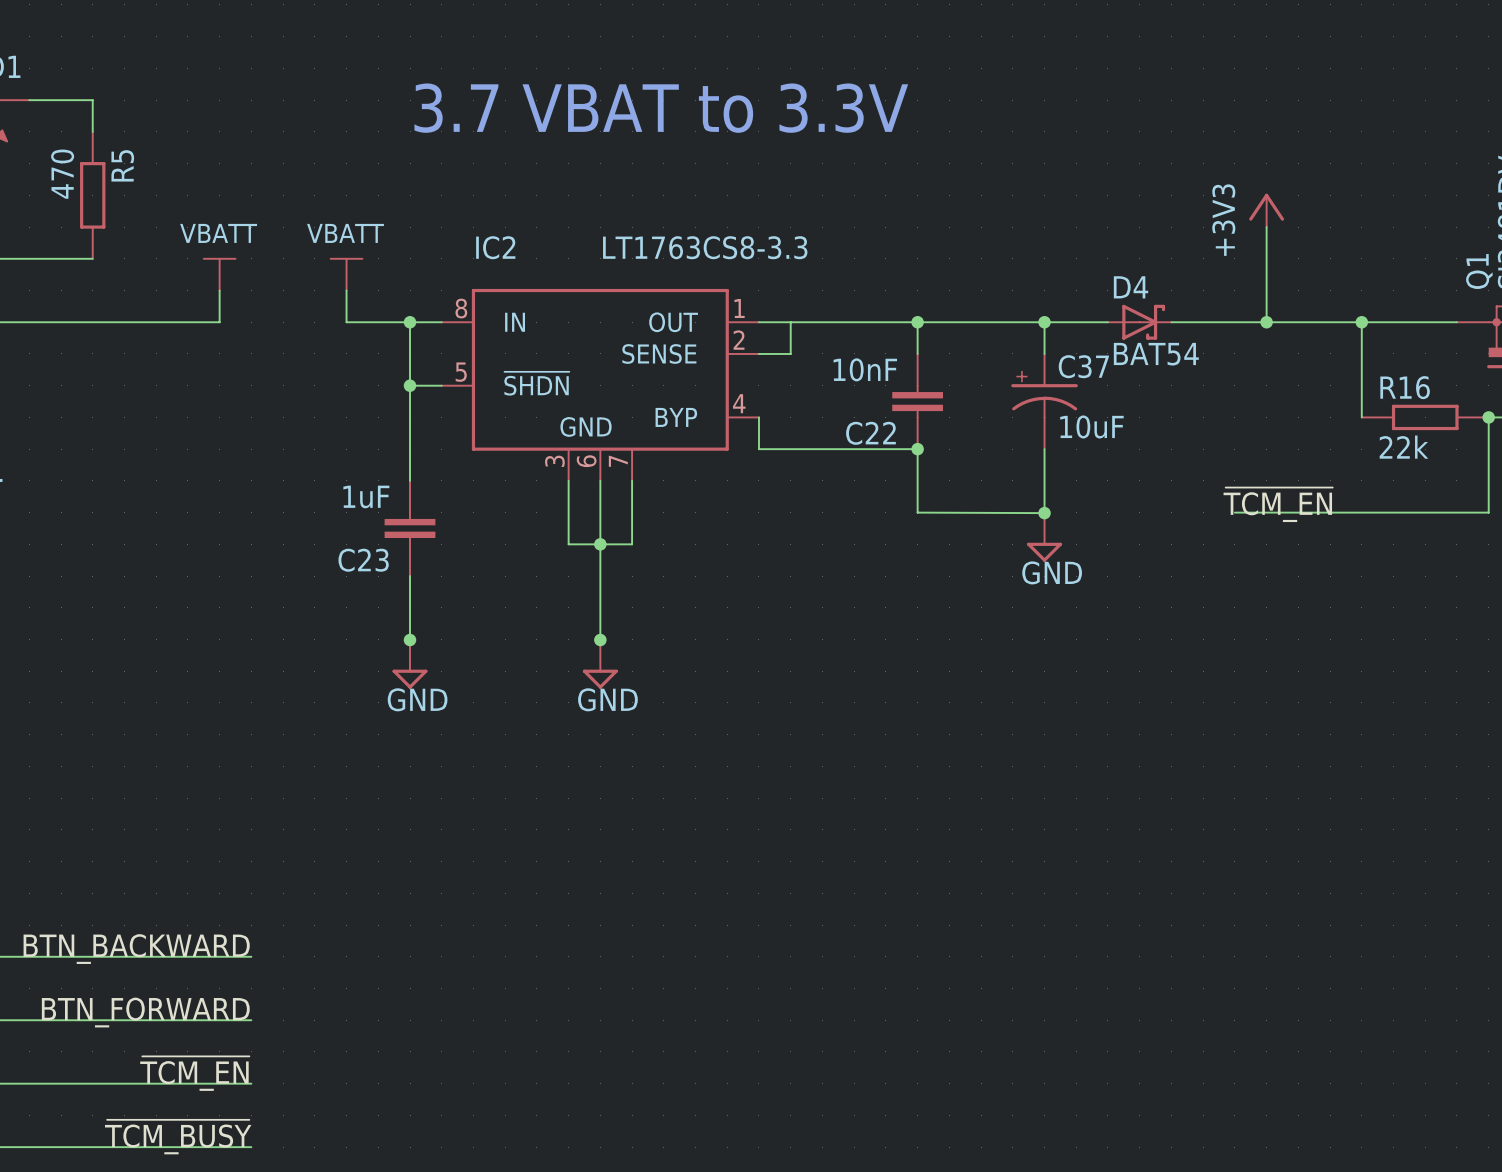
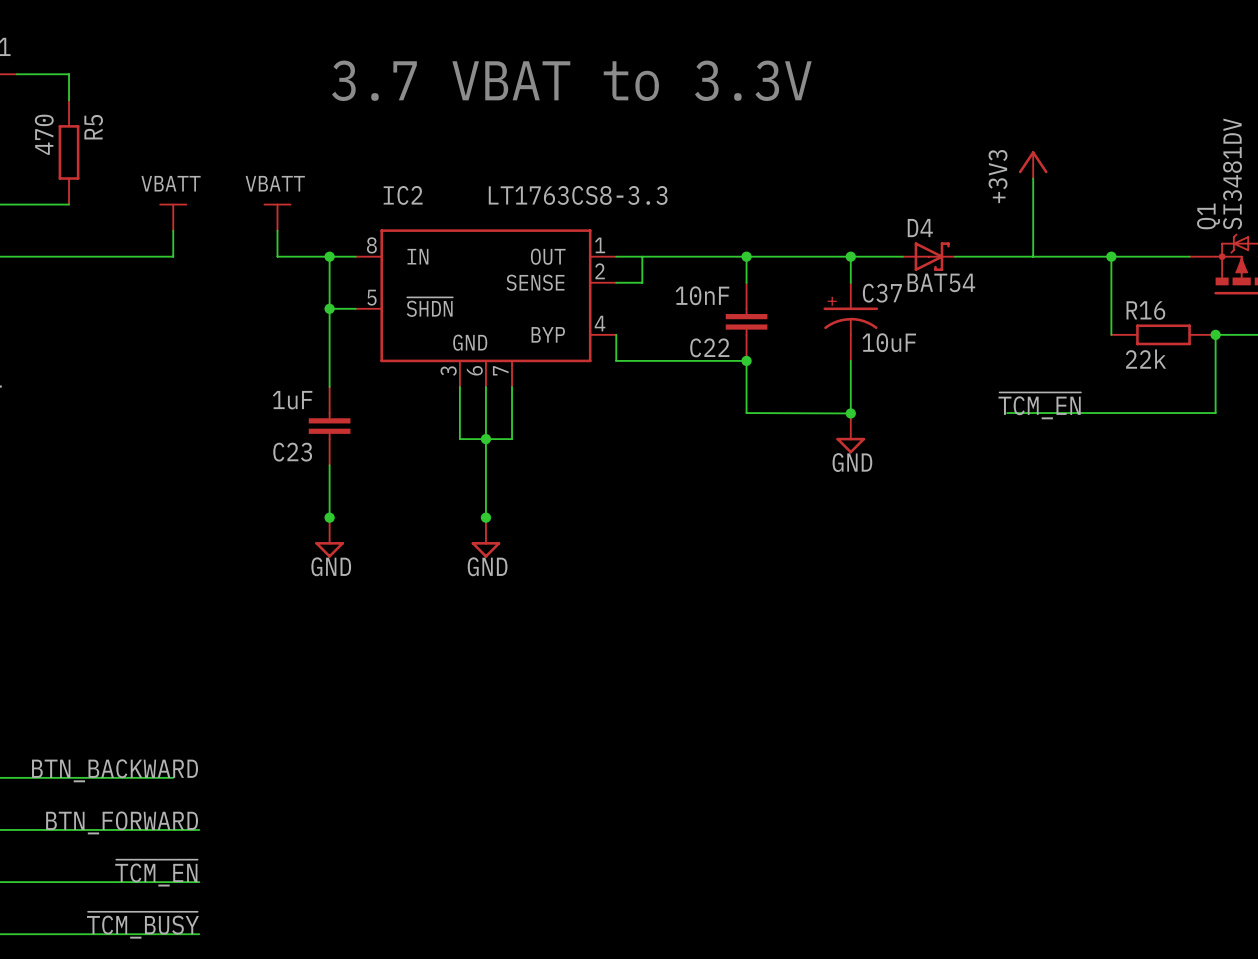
junction: (1266, 322) -> none
wire: (219, 956) (251, 956) -> none

